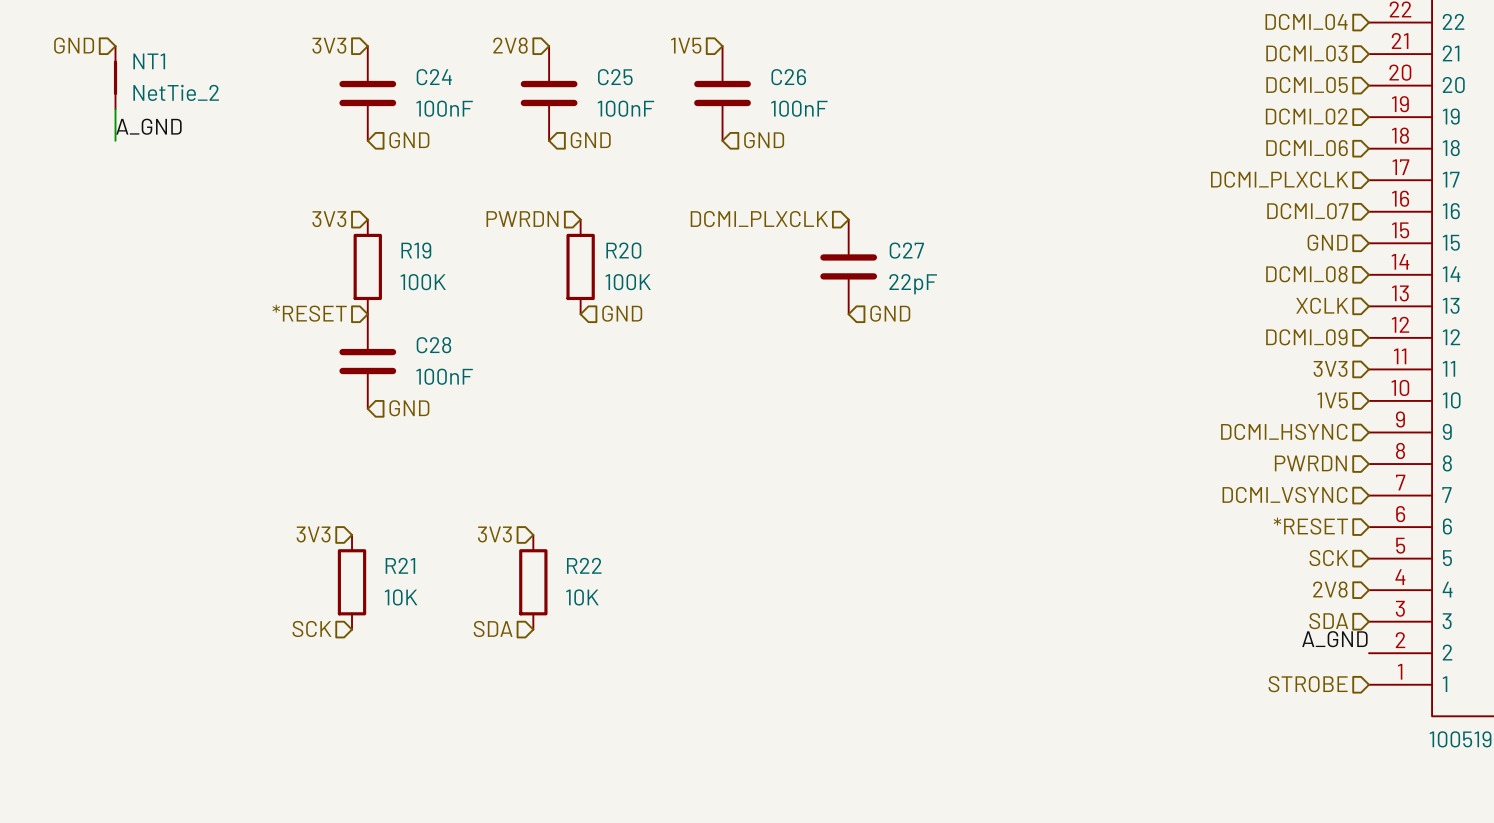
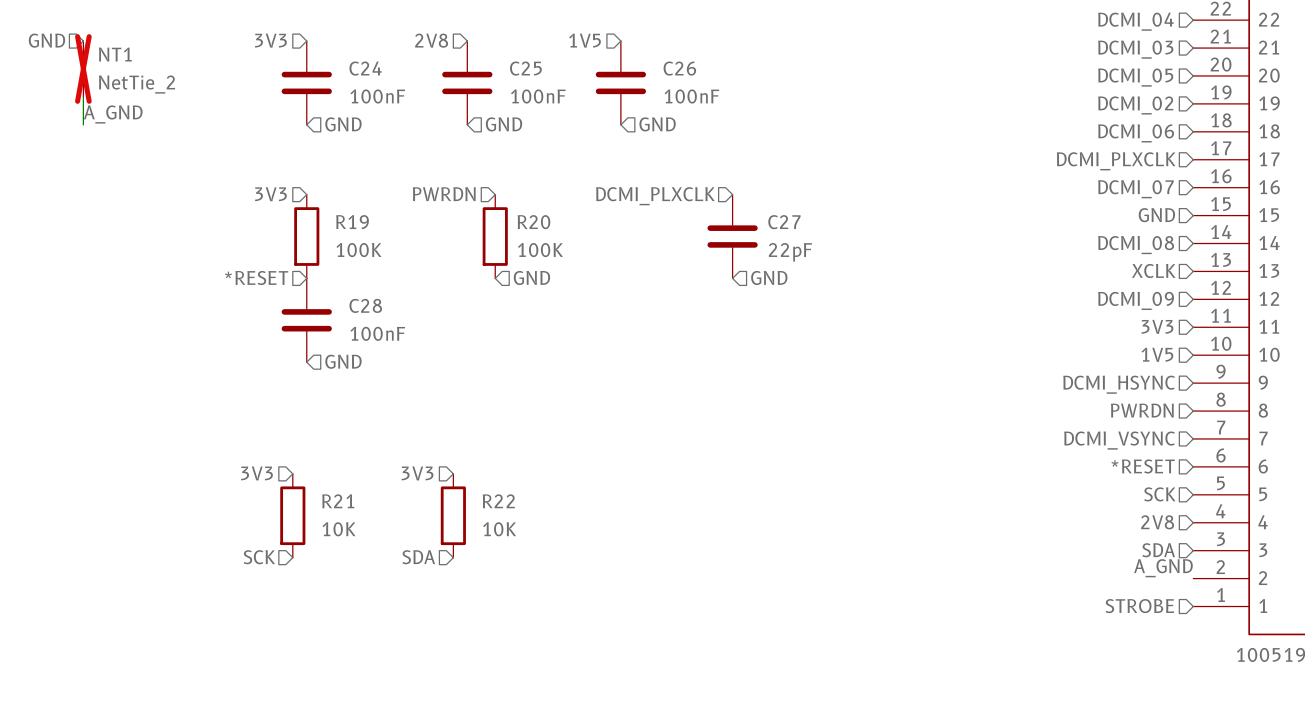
NT1 do-not-place cross: none -> (83, 69)

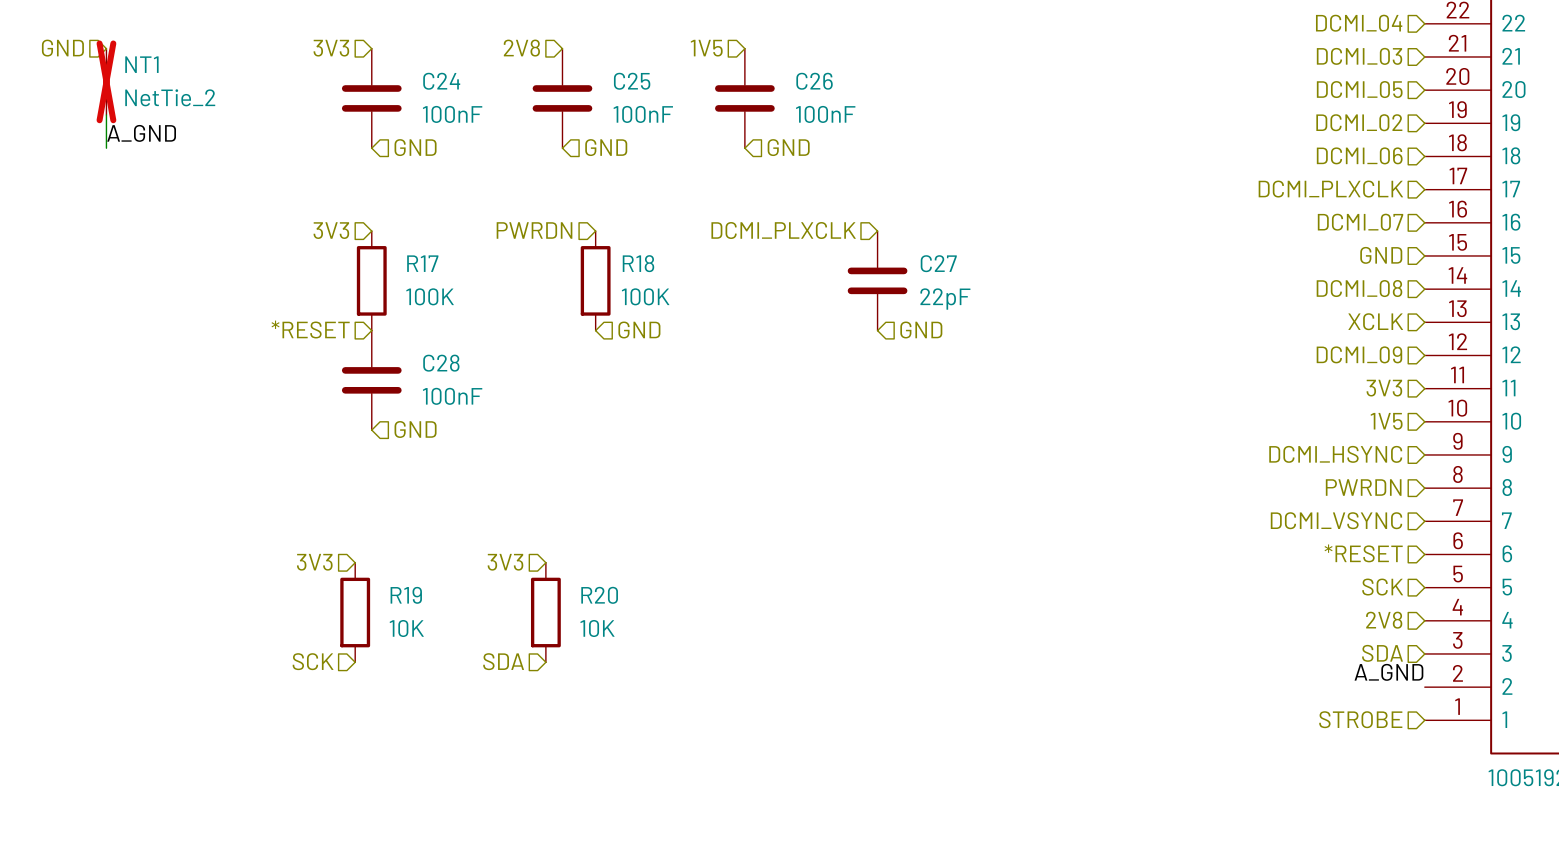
R19 name: R19 (352, 222) -> R17 (422, 263)
R20 name: R20 (533, 222) -> R18 (638, 263)
R21 name: R21 (338, 501) -> R19 (406, 595)
R22 name: R22 (498, 501) -> R20 (599, 595)

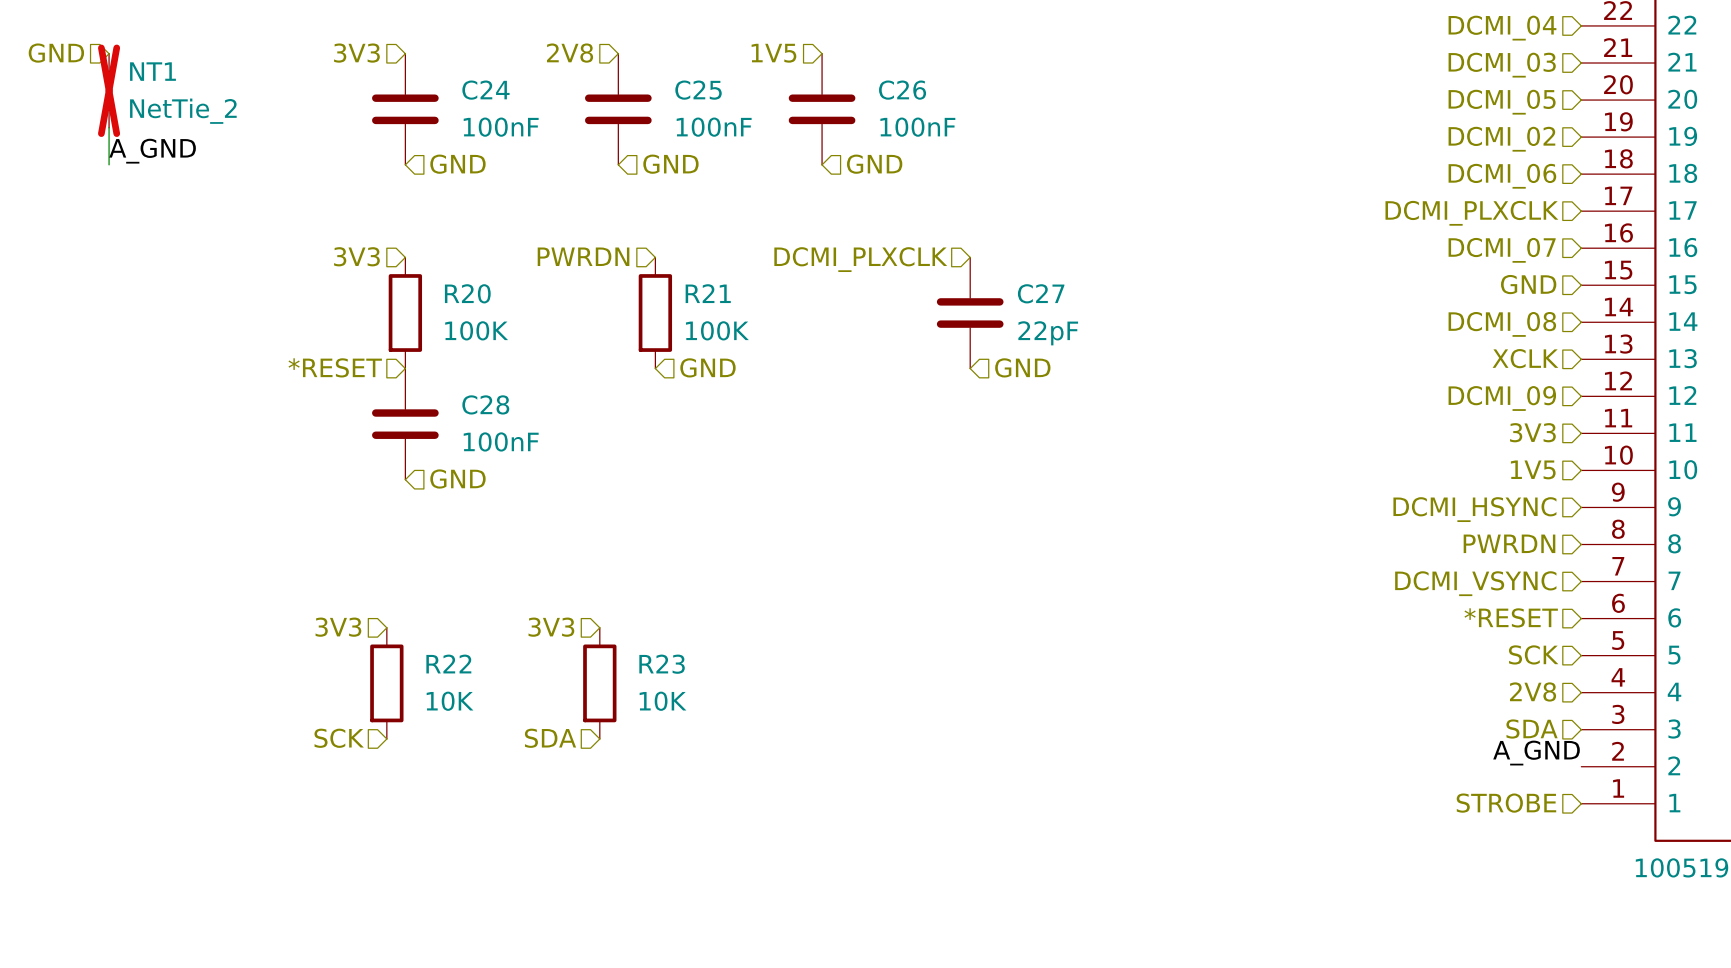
R17 name: R17 (422, 263) -> R20 (467, 293)
R18 name: R18 (638, 263) -> R21 (708, 293)
R19 name: R19 (406, 595) -> R22 (448, 664)
R20 name: R20 (599, 595) -> R23 (662, 664)

